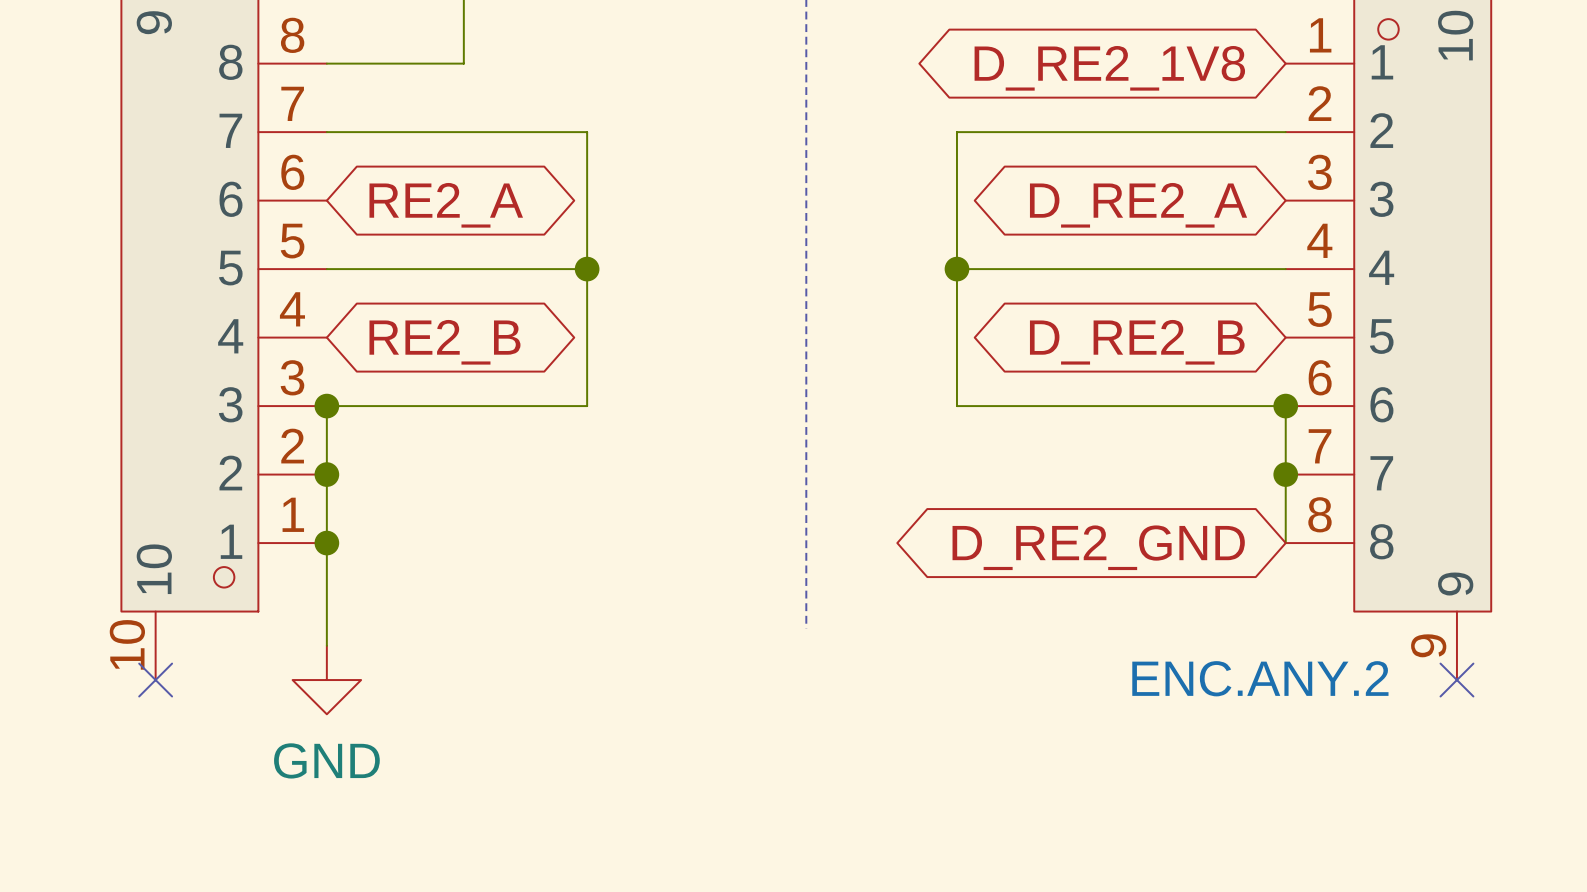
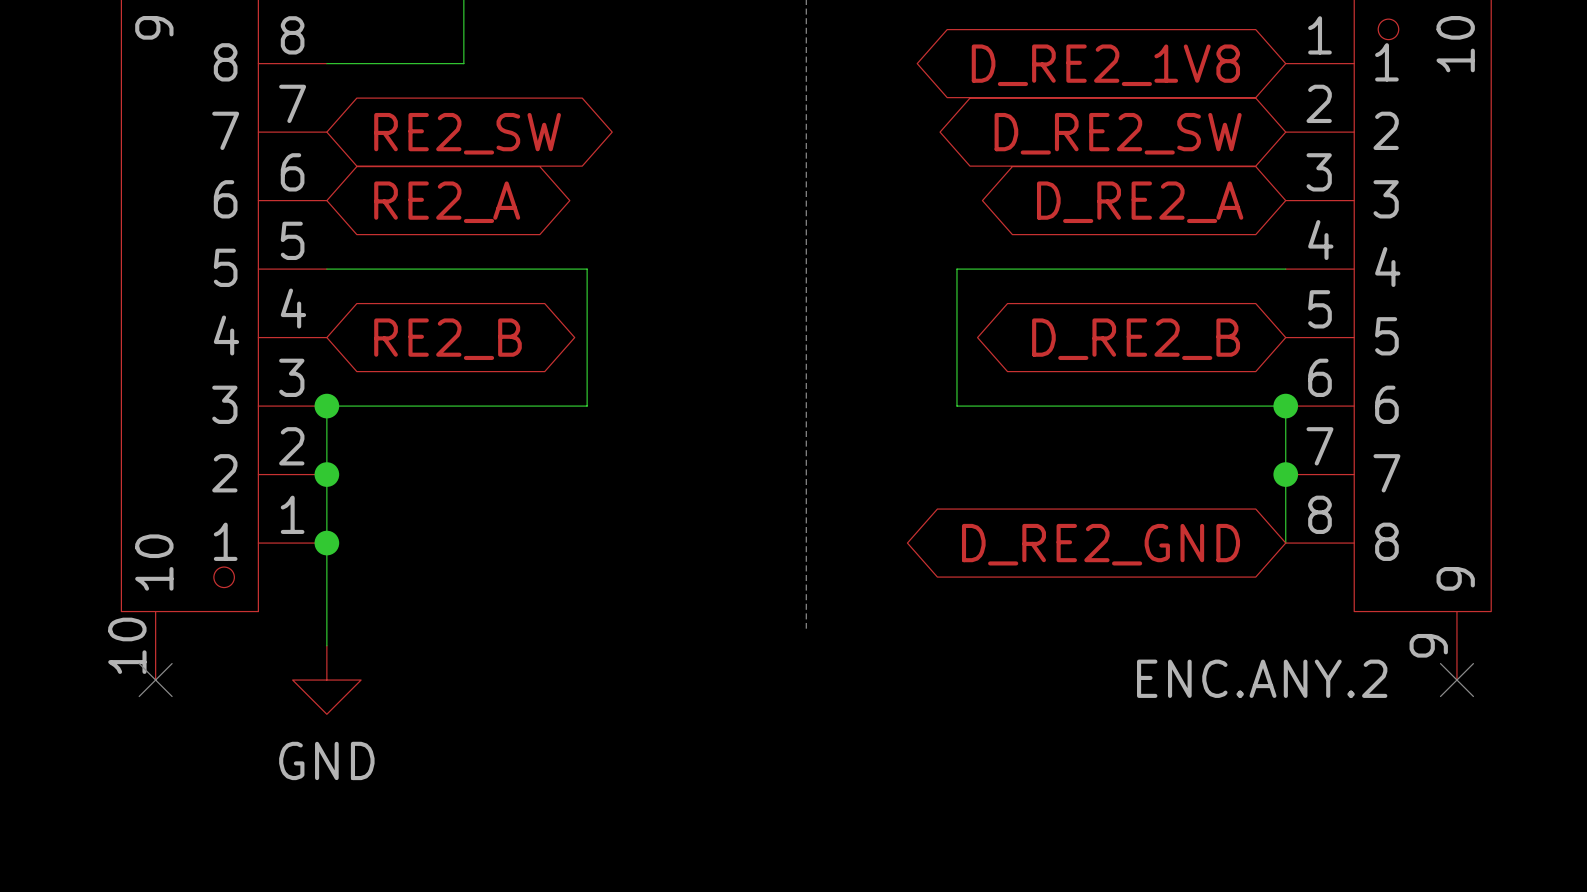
wire: (326, 132) (587, 132) (587, 269) -> none
wire: (1285, 132) (956, 132) (956, 269) -> none
global label: none -> RE2_SW (467, 133)
global label: none -> D_RE2_SW (1118, 133)
junction: (587, 269) -> none
junction: (956, 269) -> none

